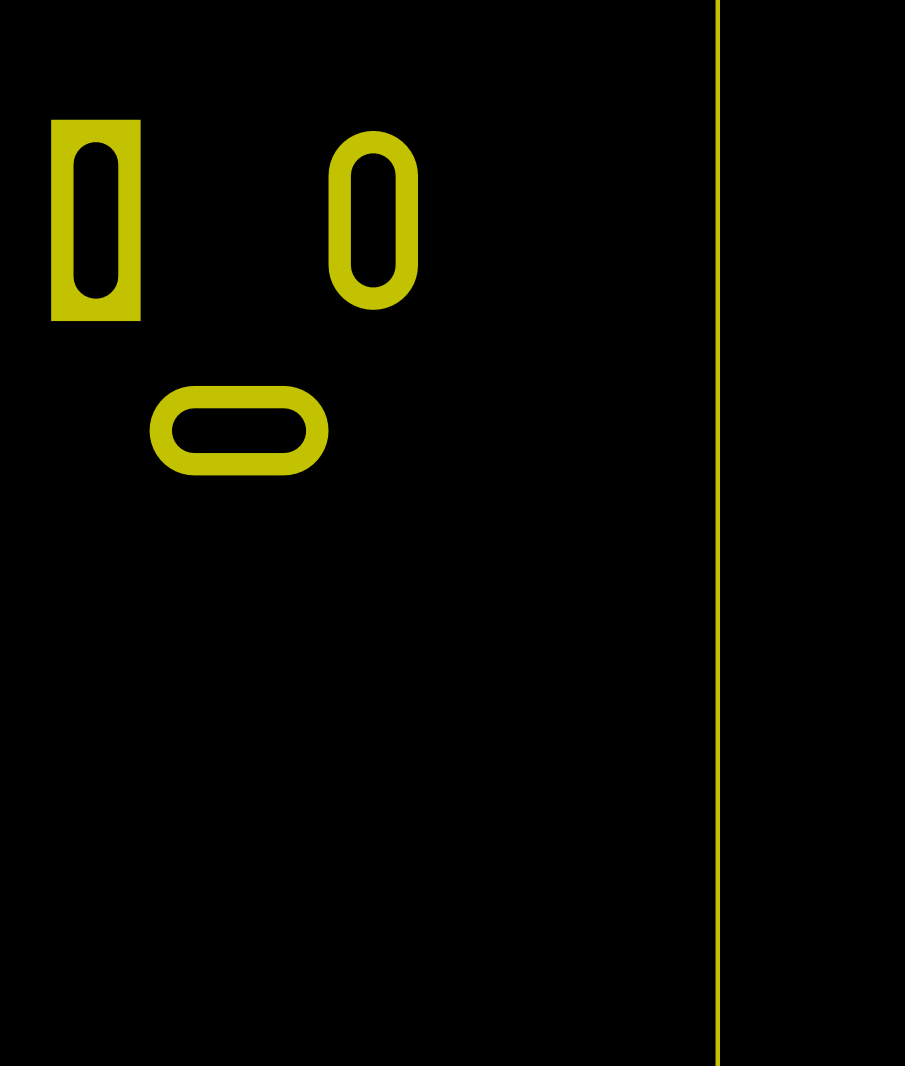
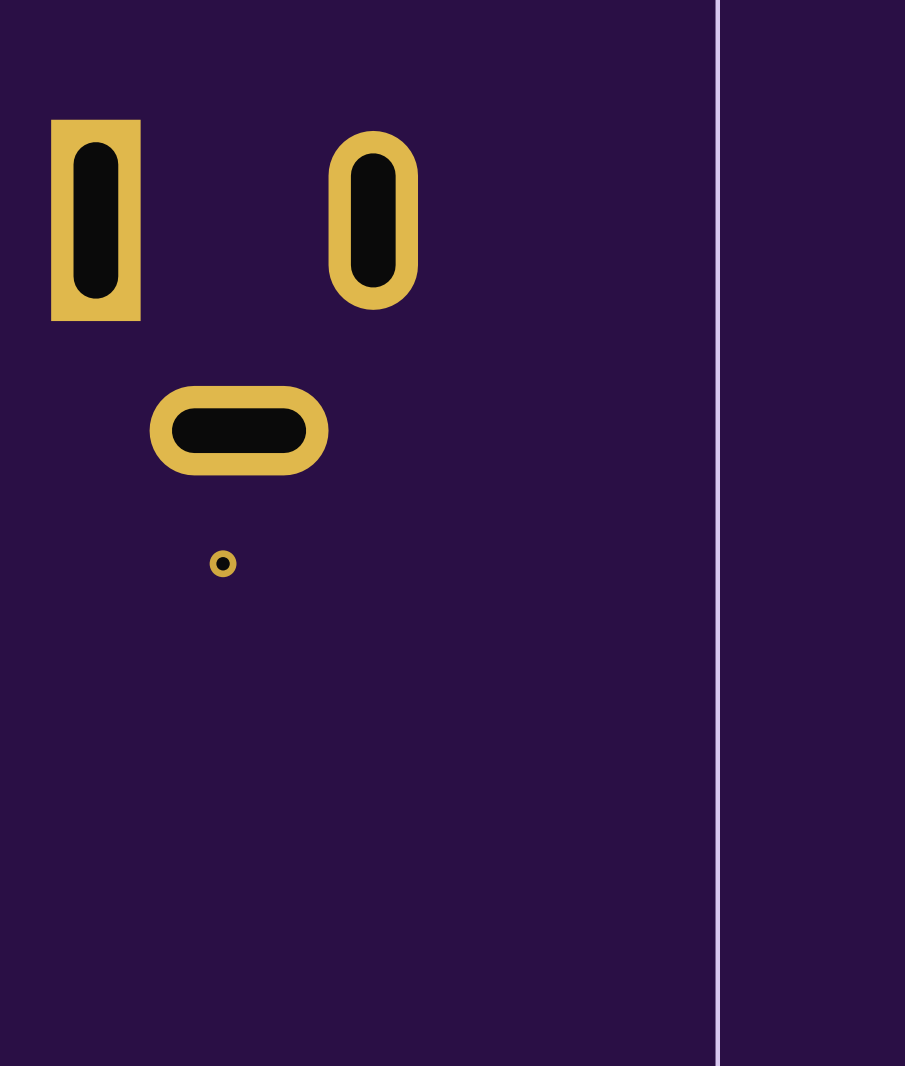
via: none -> (223, 563)

